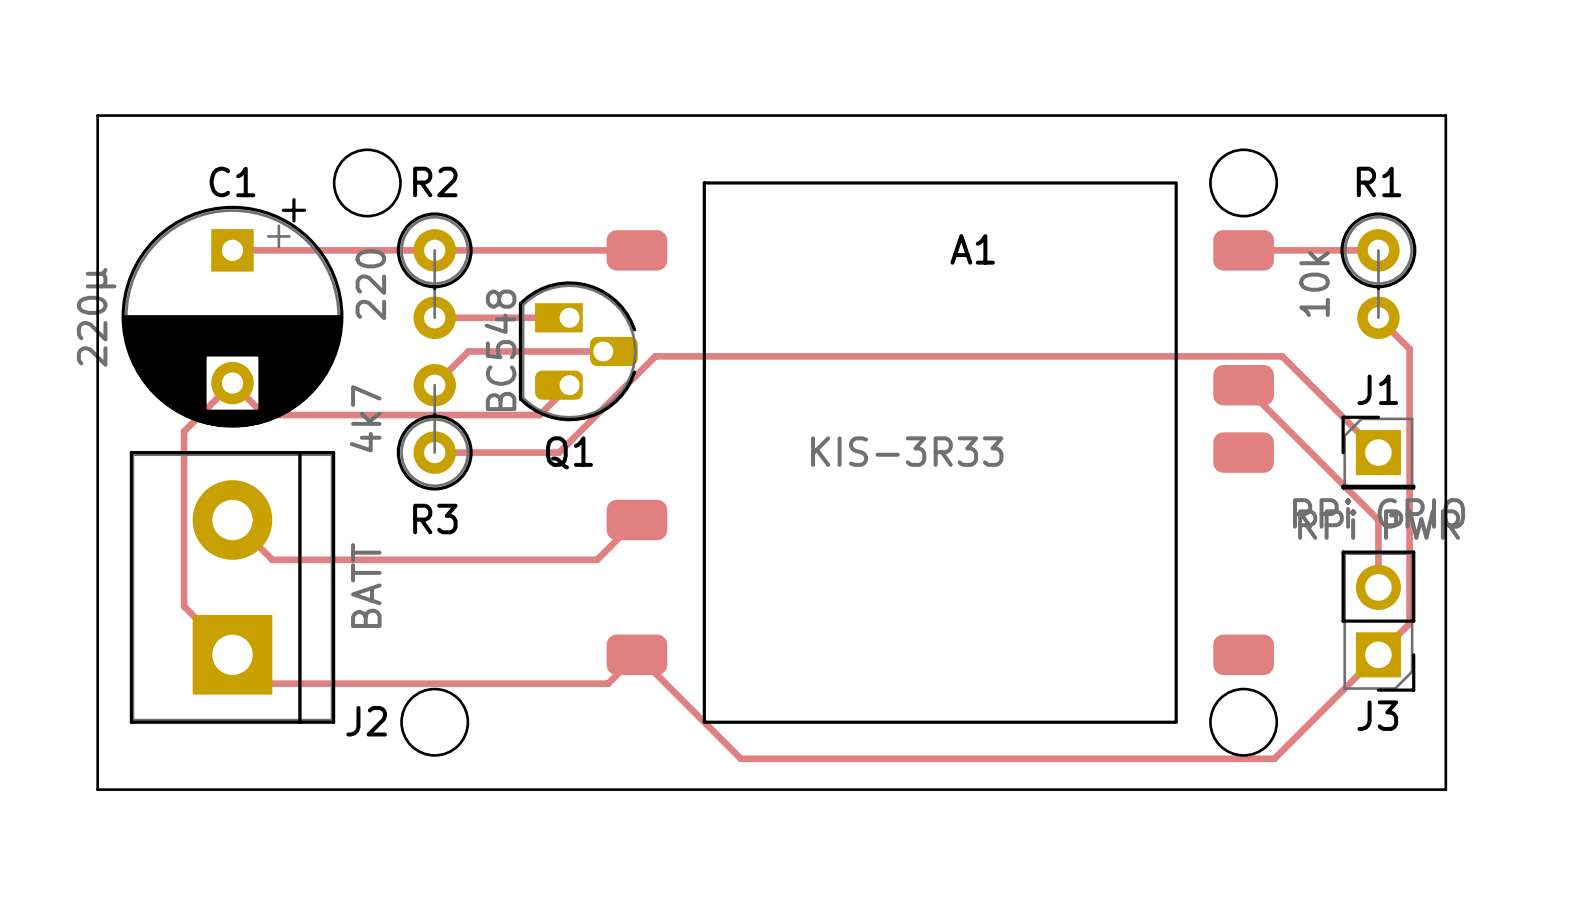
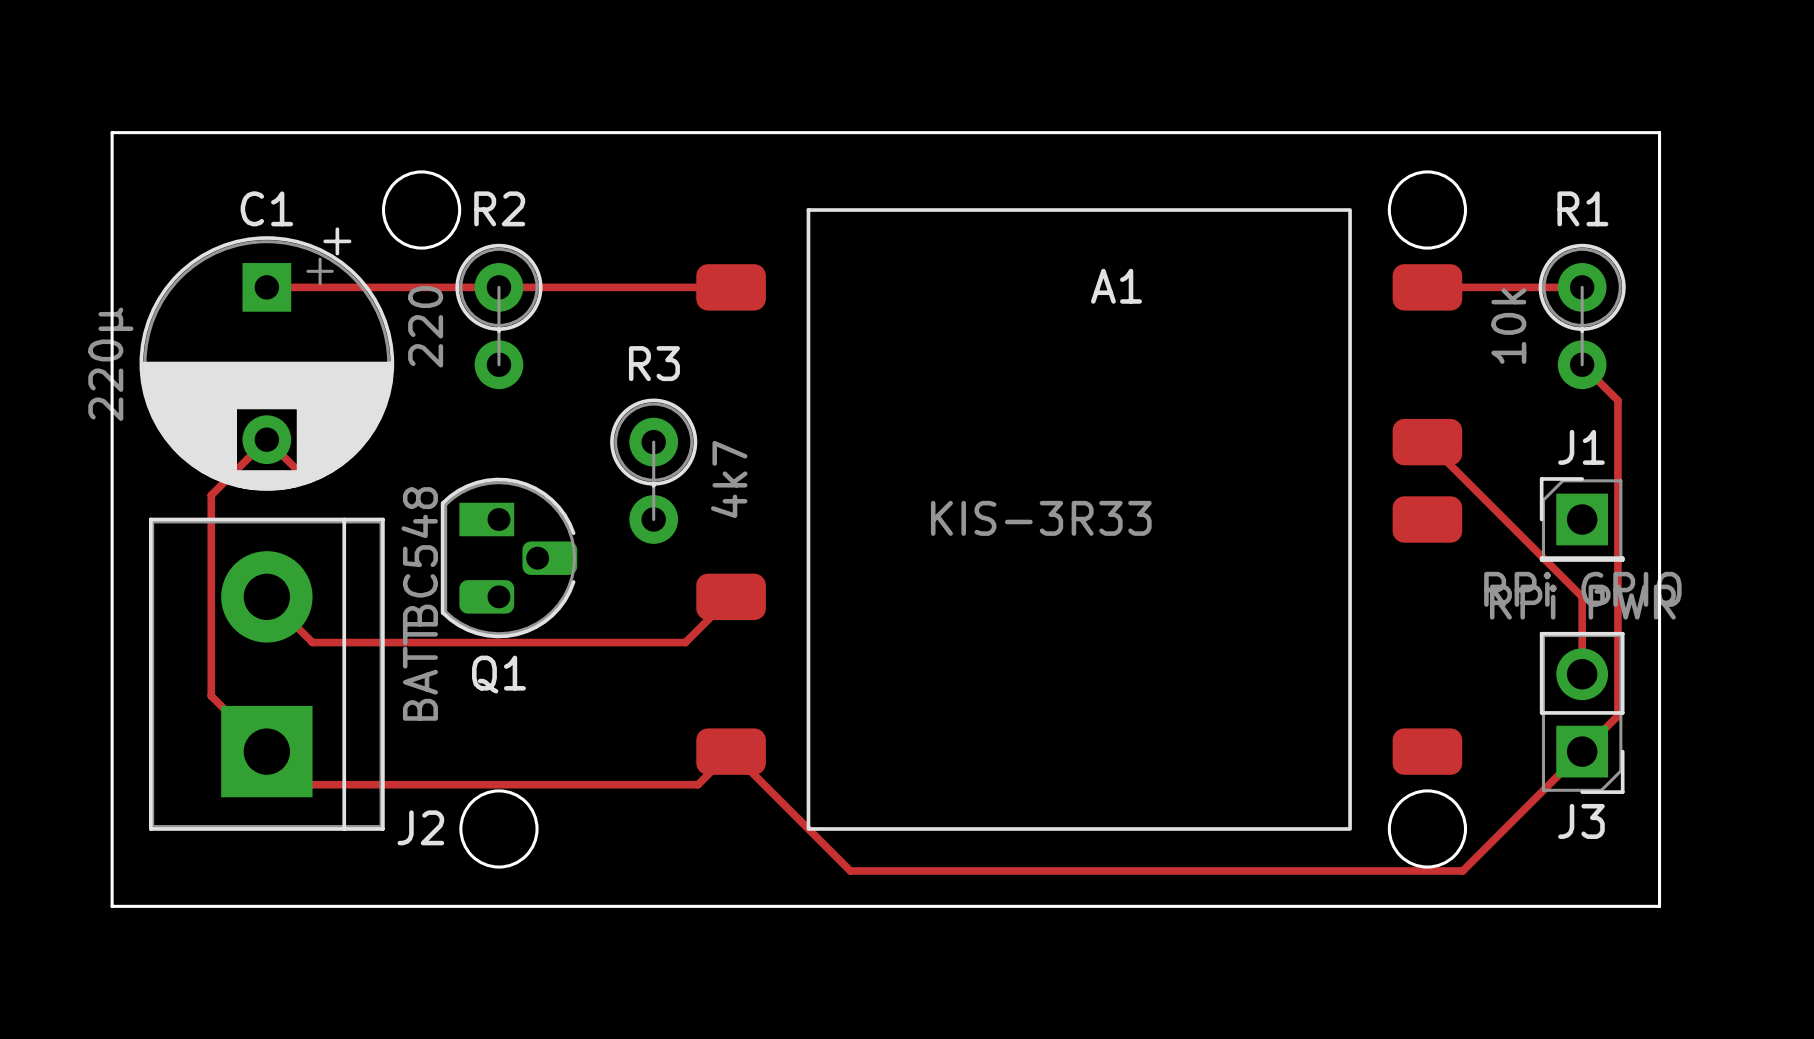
track: (434, 317) (569, 317) -> none
Q1 position: (578, 351) -> (509, 558)
track: (603, 351) (468, 351) (434, 385) -> none
track: (569, 385) (539, 415) (264, 415) -> none
R3 rotation: 0° (434, 427) -> 180° (653, 471)
R3 position: (434, 427) -> (653, 471)
track: (434, 452) (559, 452) (655, 356) (1282, 356) (1378, 452) -> none

